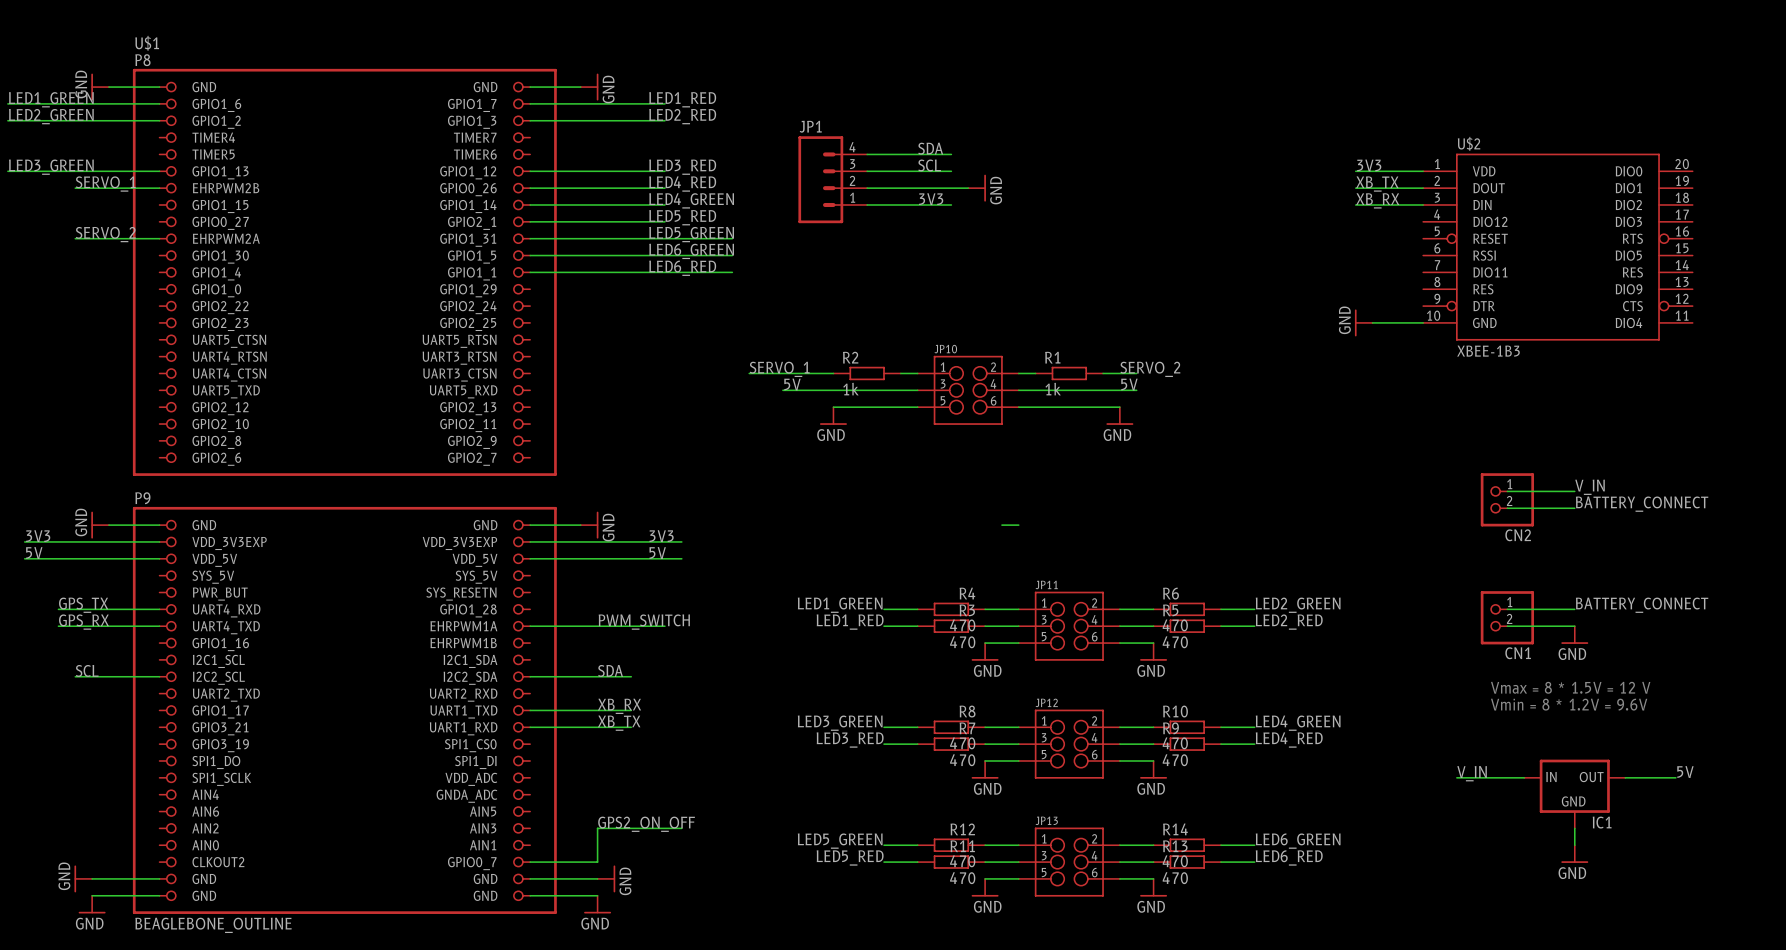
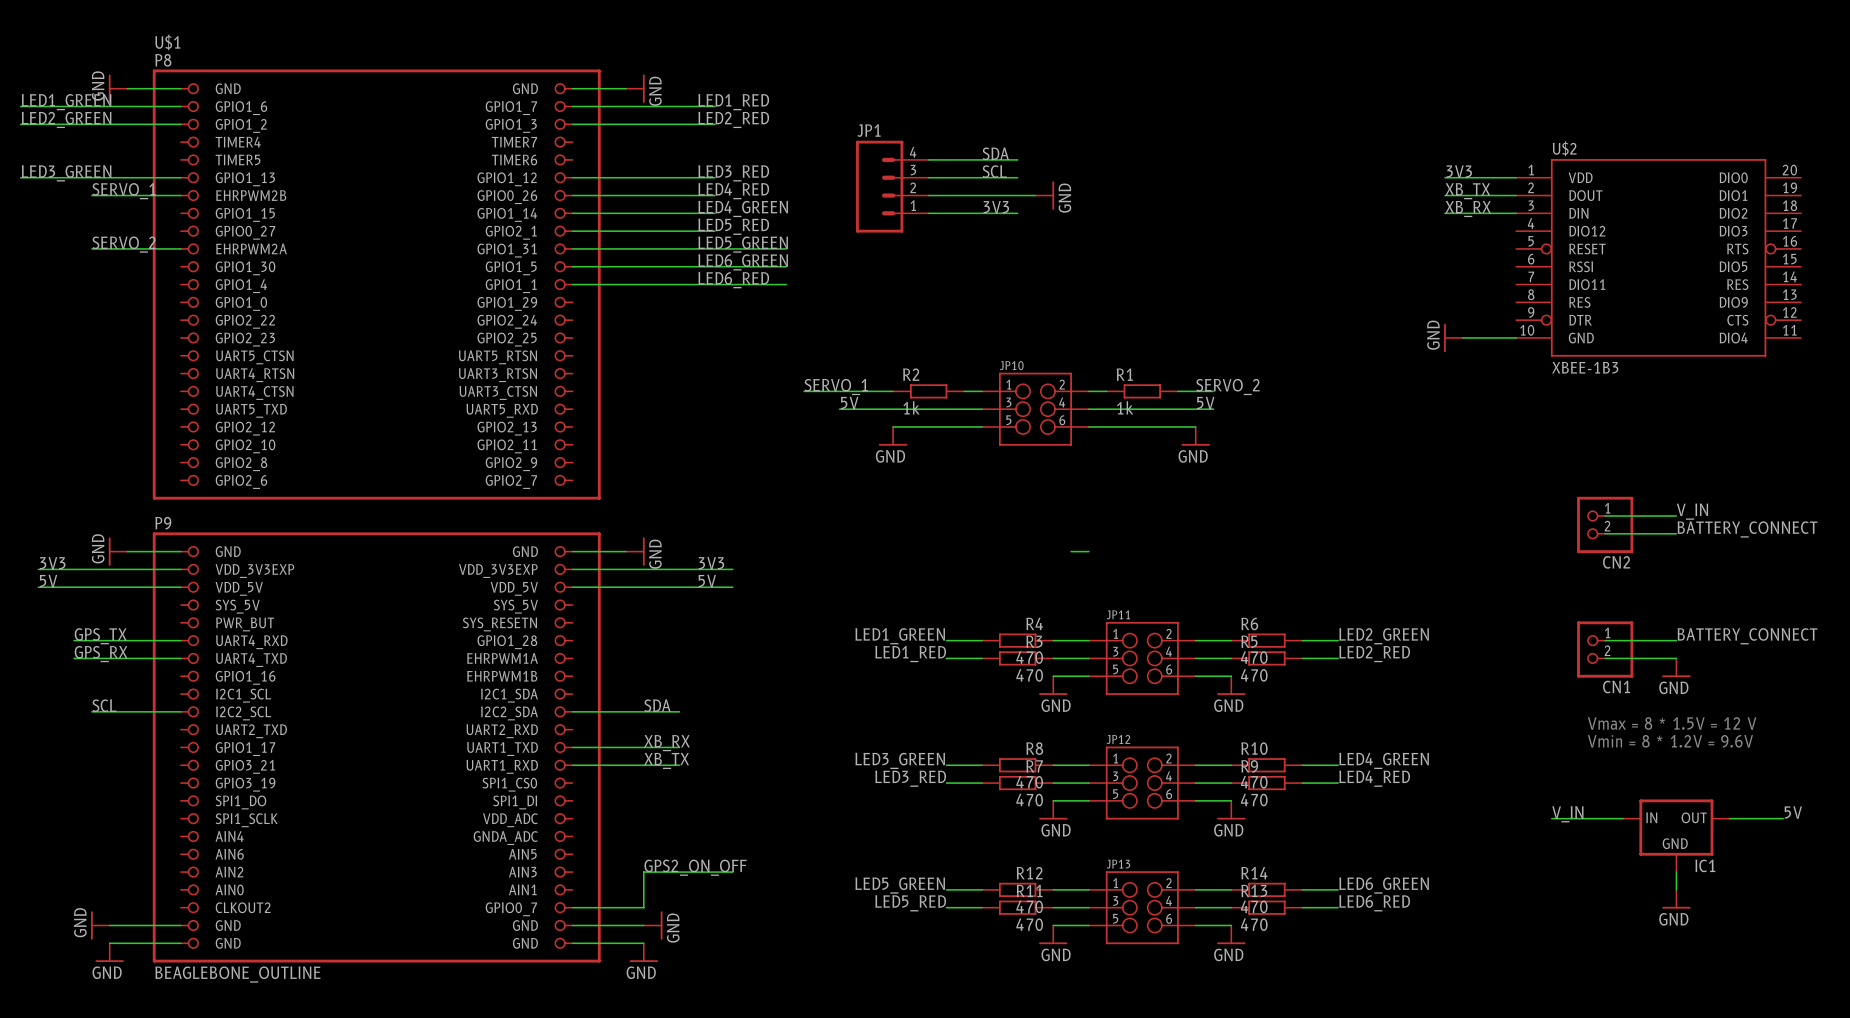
label: PWM_SWITCH (644, 622) -> none
wire: (530, 626) (664, 626) -> none

